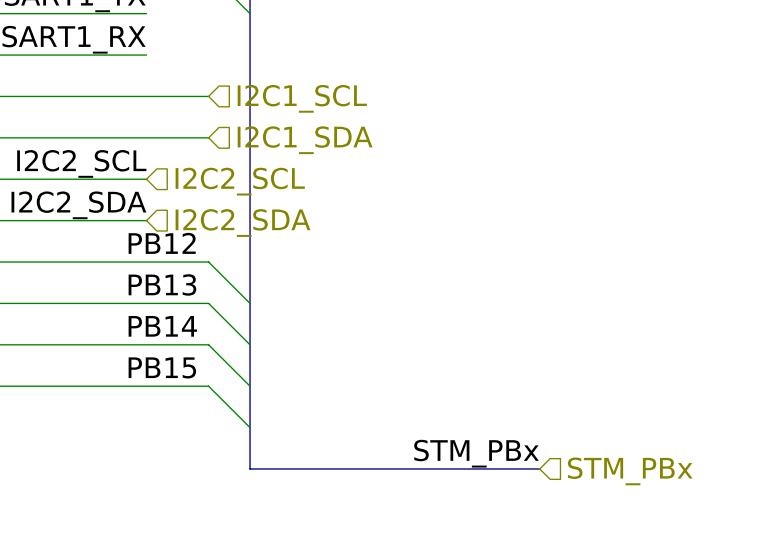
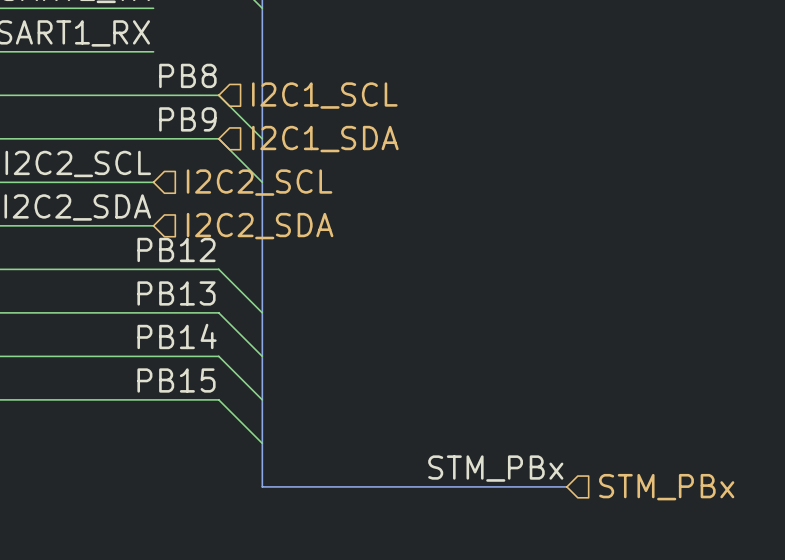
label: none -> PB8 (187, 75)
wire: none -> (218, 95) (262, 138)
label: none -> PB9 (187, 119)
wire: none -> (218, 138) (262, 182)

